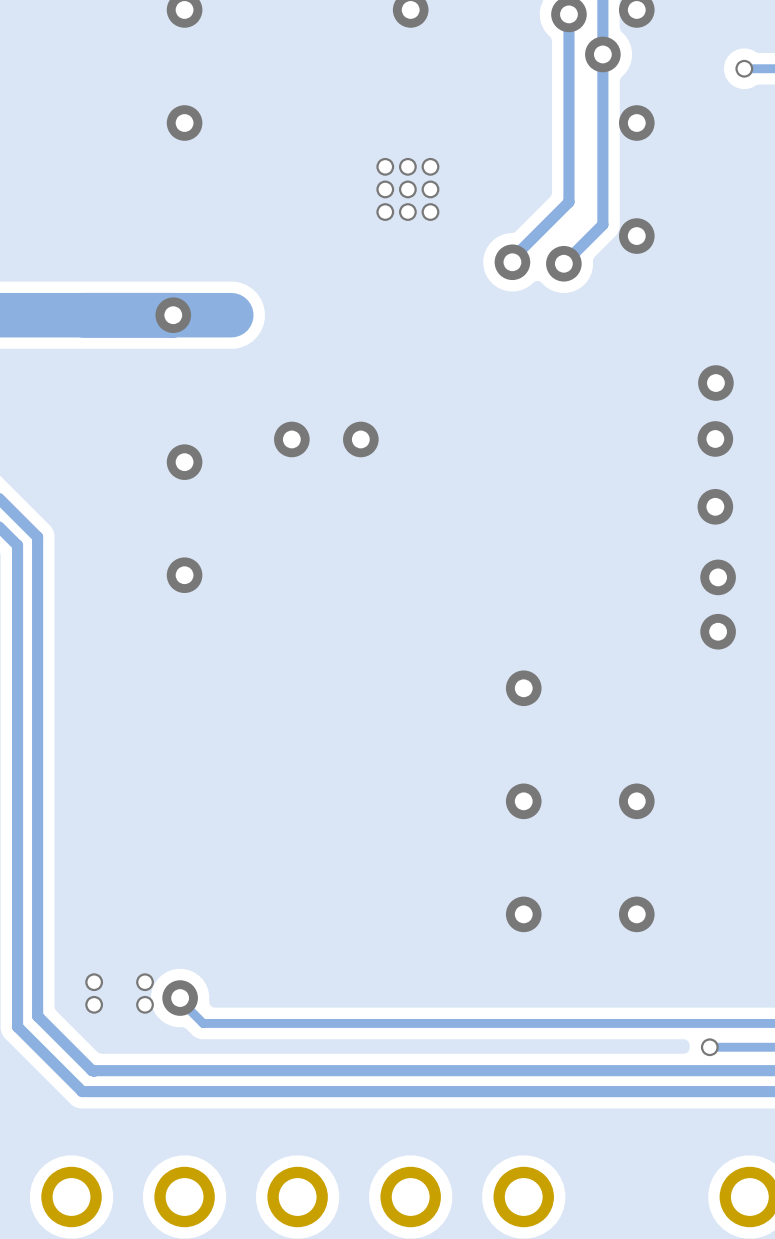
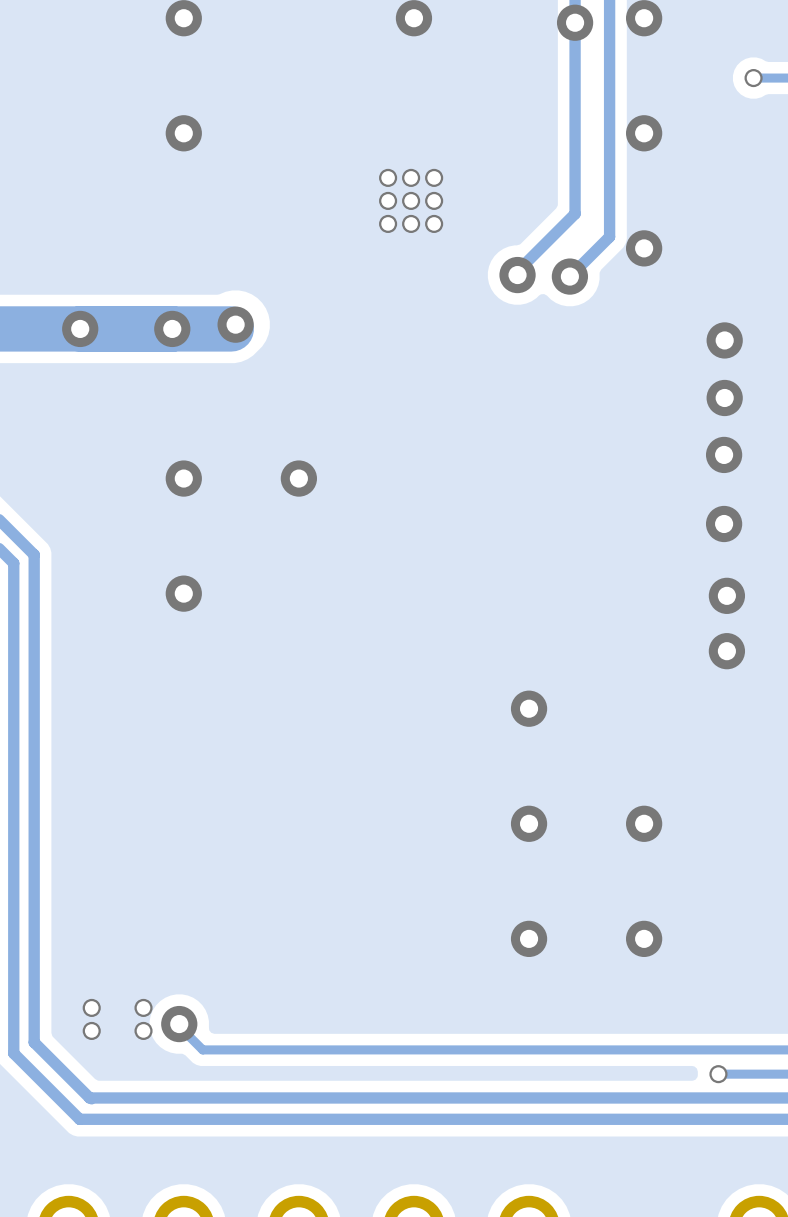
via: (602, 54) -> none
via: none -> (235, 324)
via: none -> (80, 328)
via: none -> (724, 340)
via position: (291, 439) -> (298, 478)
via: (360, 439) -> none

